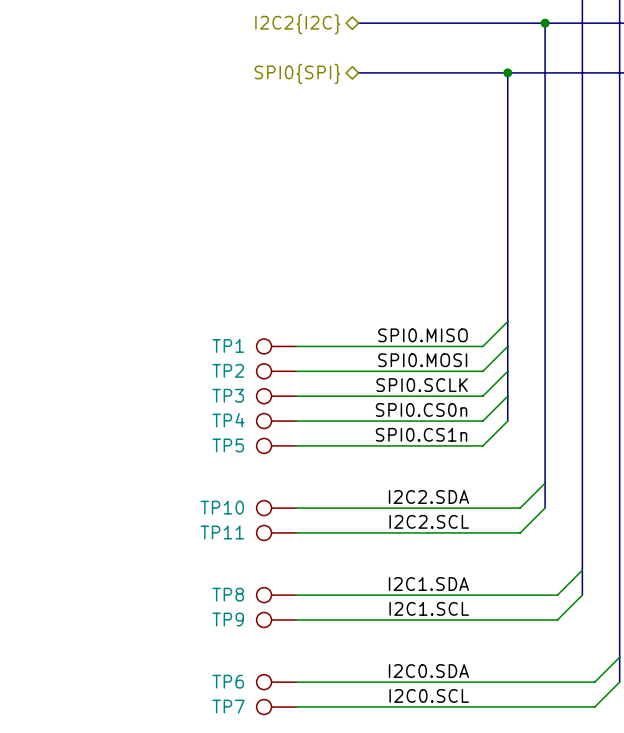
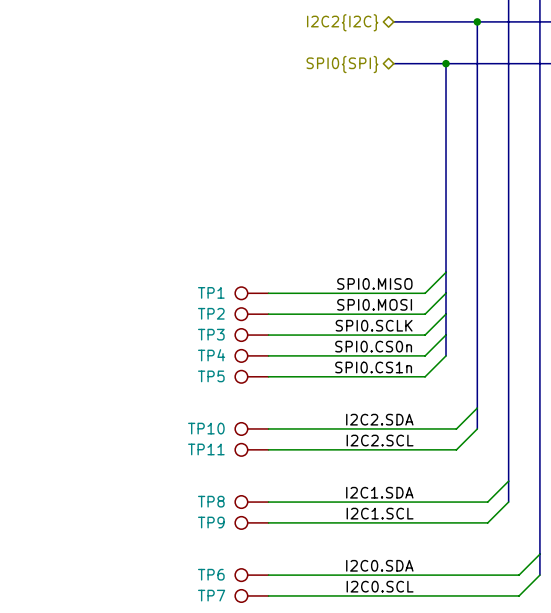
bus: (358, 23) (445, 23) -> none
hierarchical label position: I2C2{I2C} (297, 24) -> I2C2{I2C} (342, 22)
bus: (358, 72) (445, 72) -> none
hierarchical label position: SPI0{SPI} (297, 73) -> SPI0{SPI} (342, 64)

